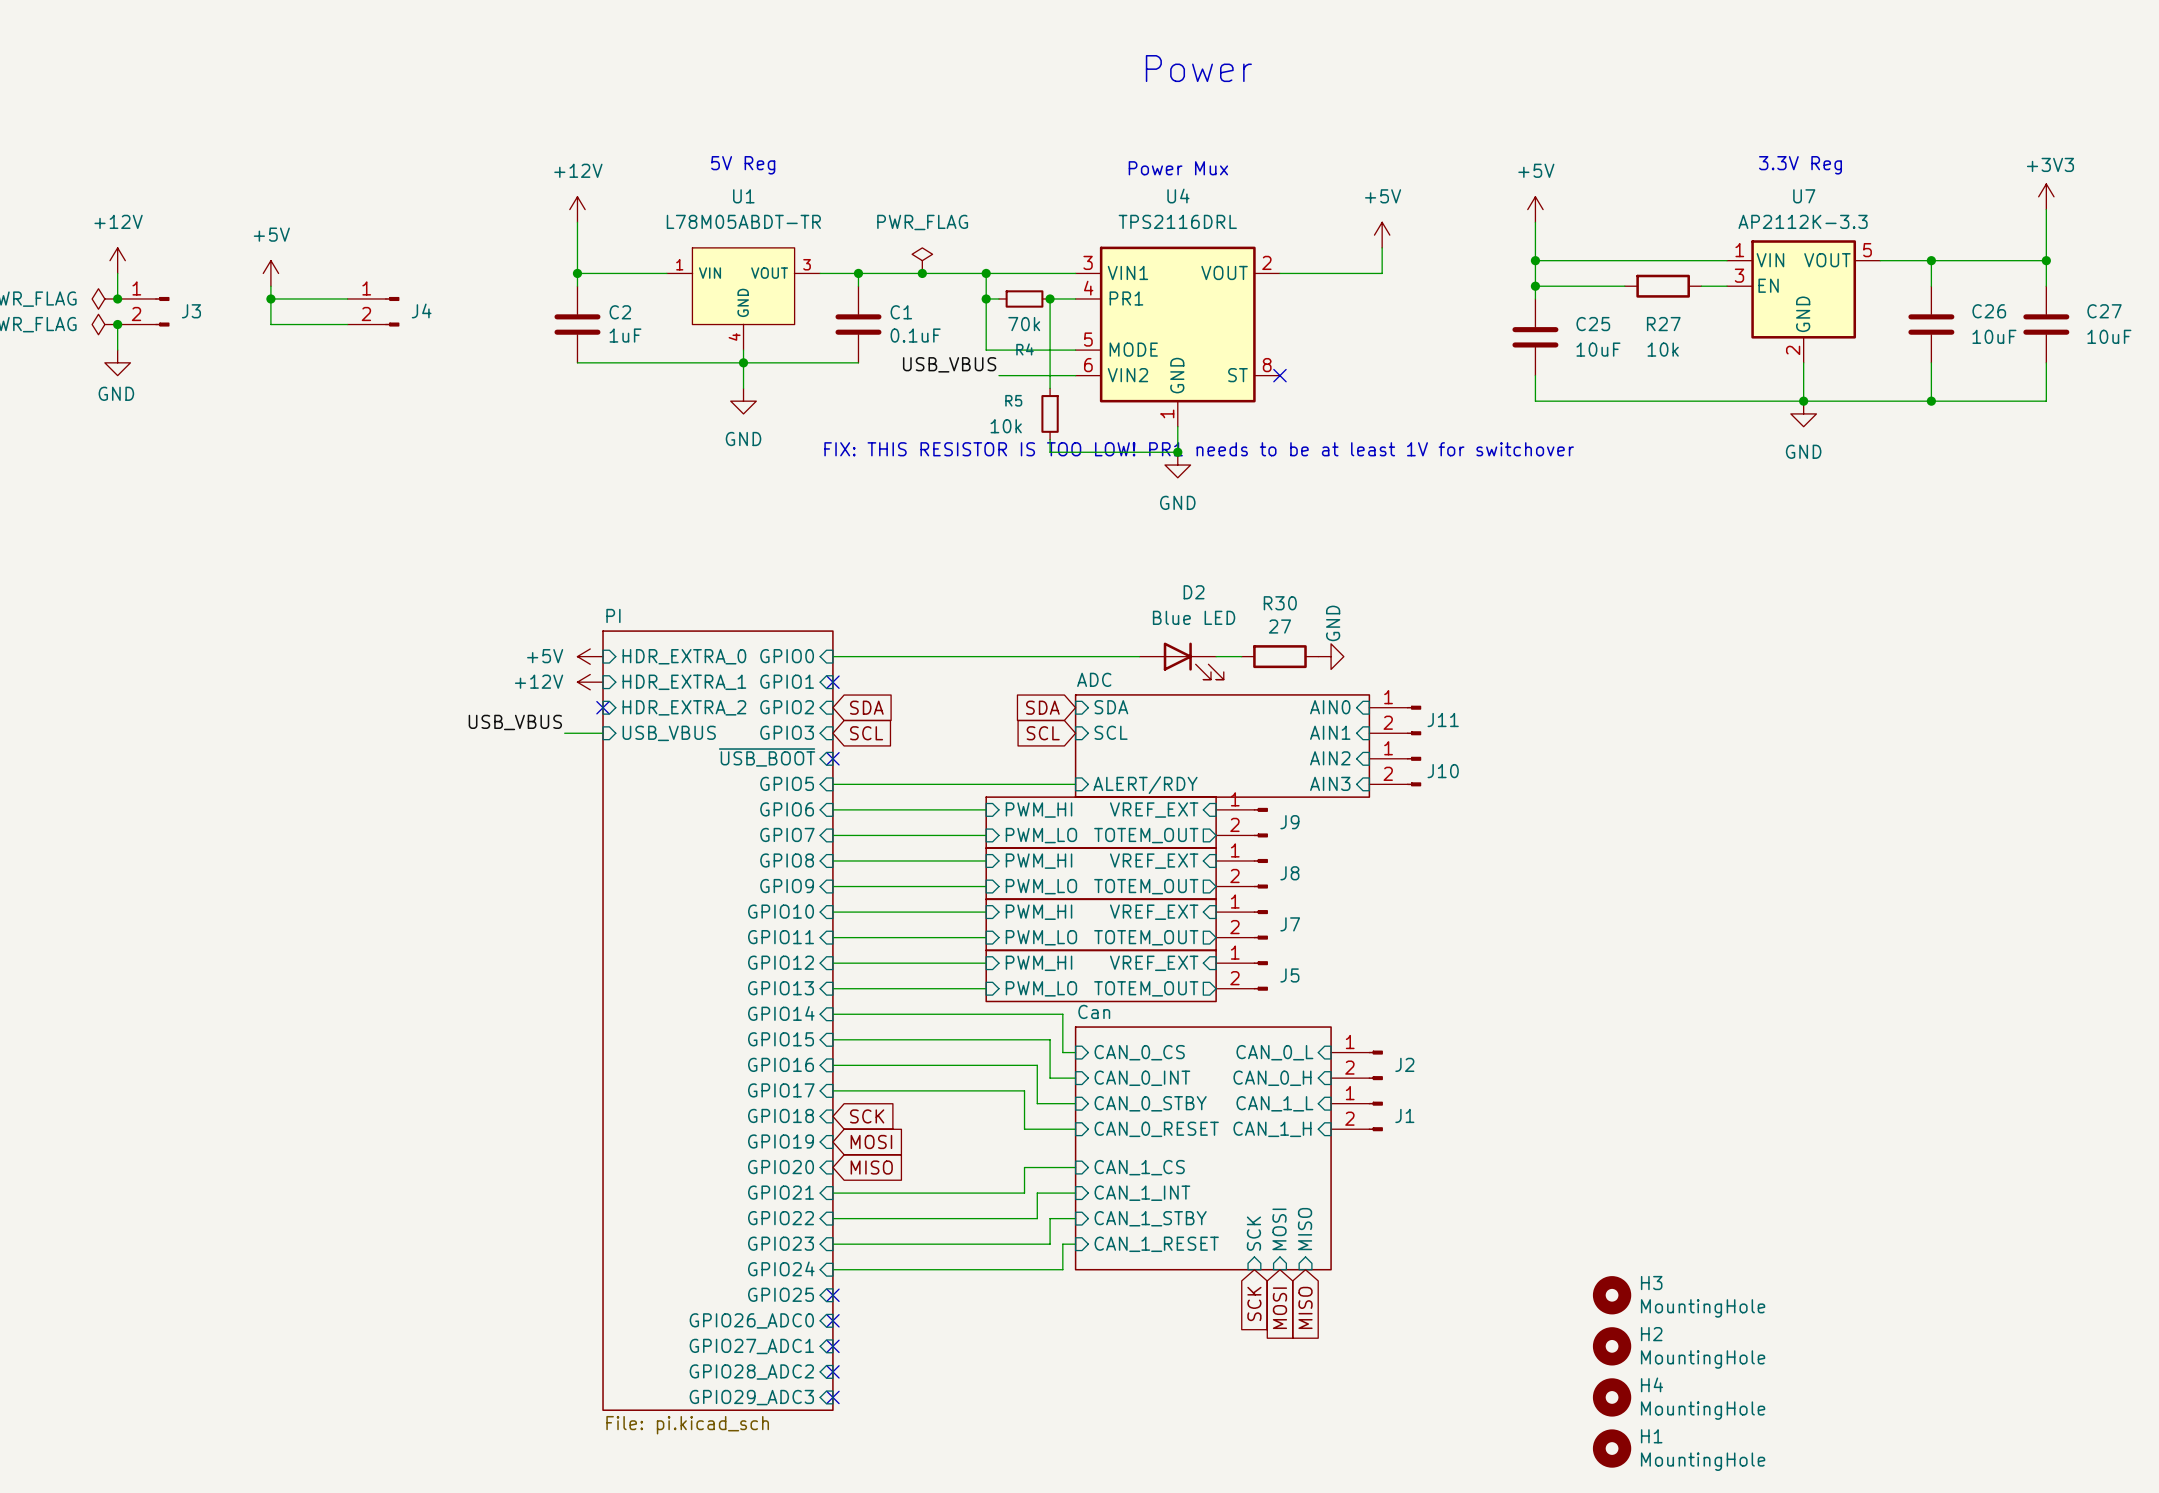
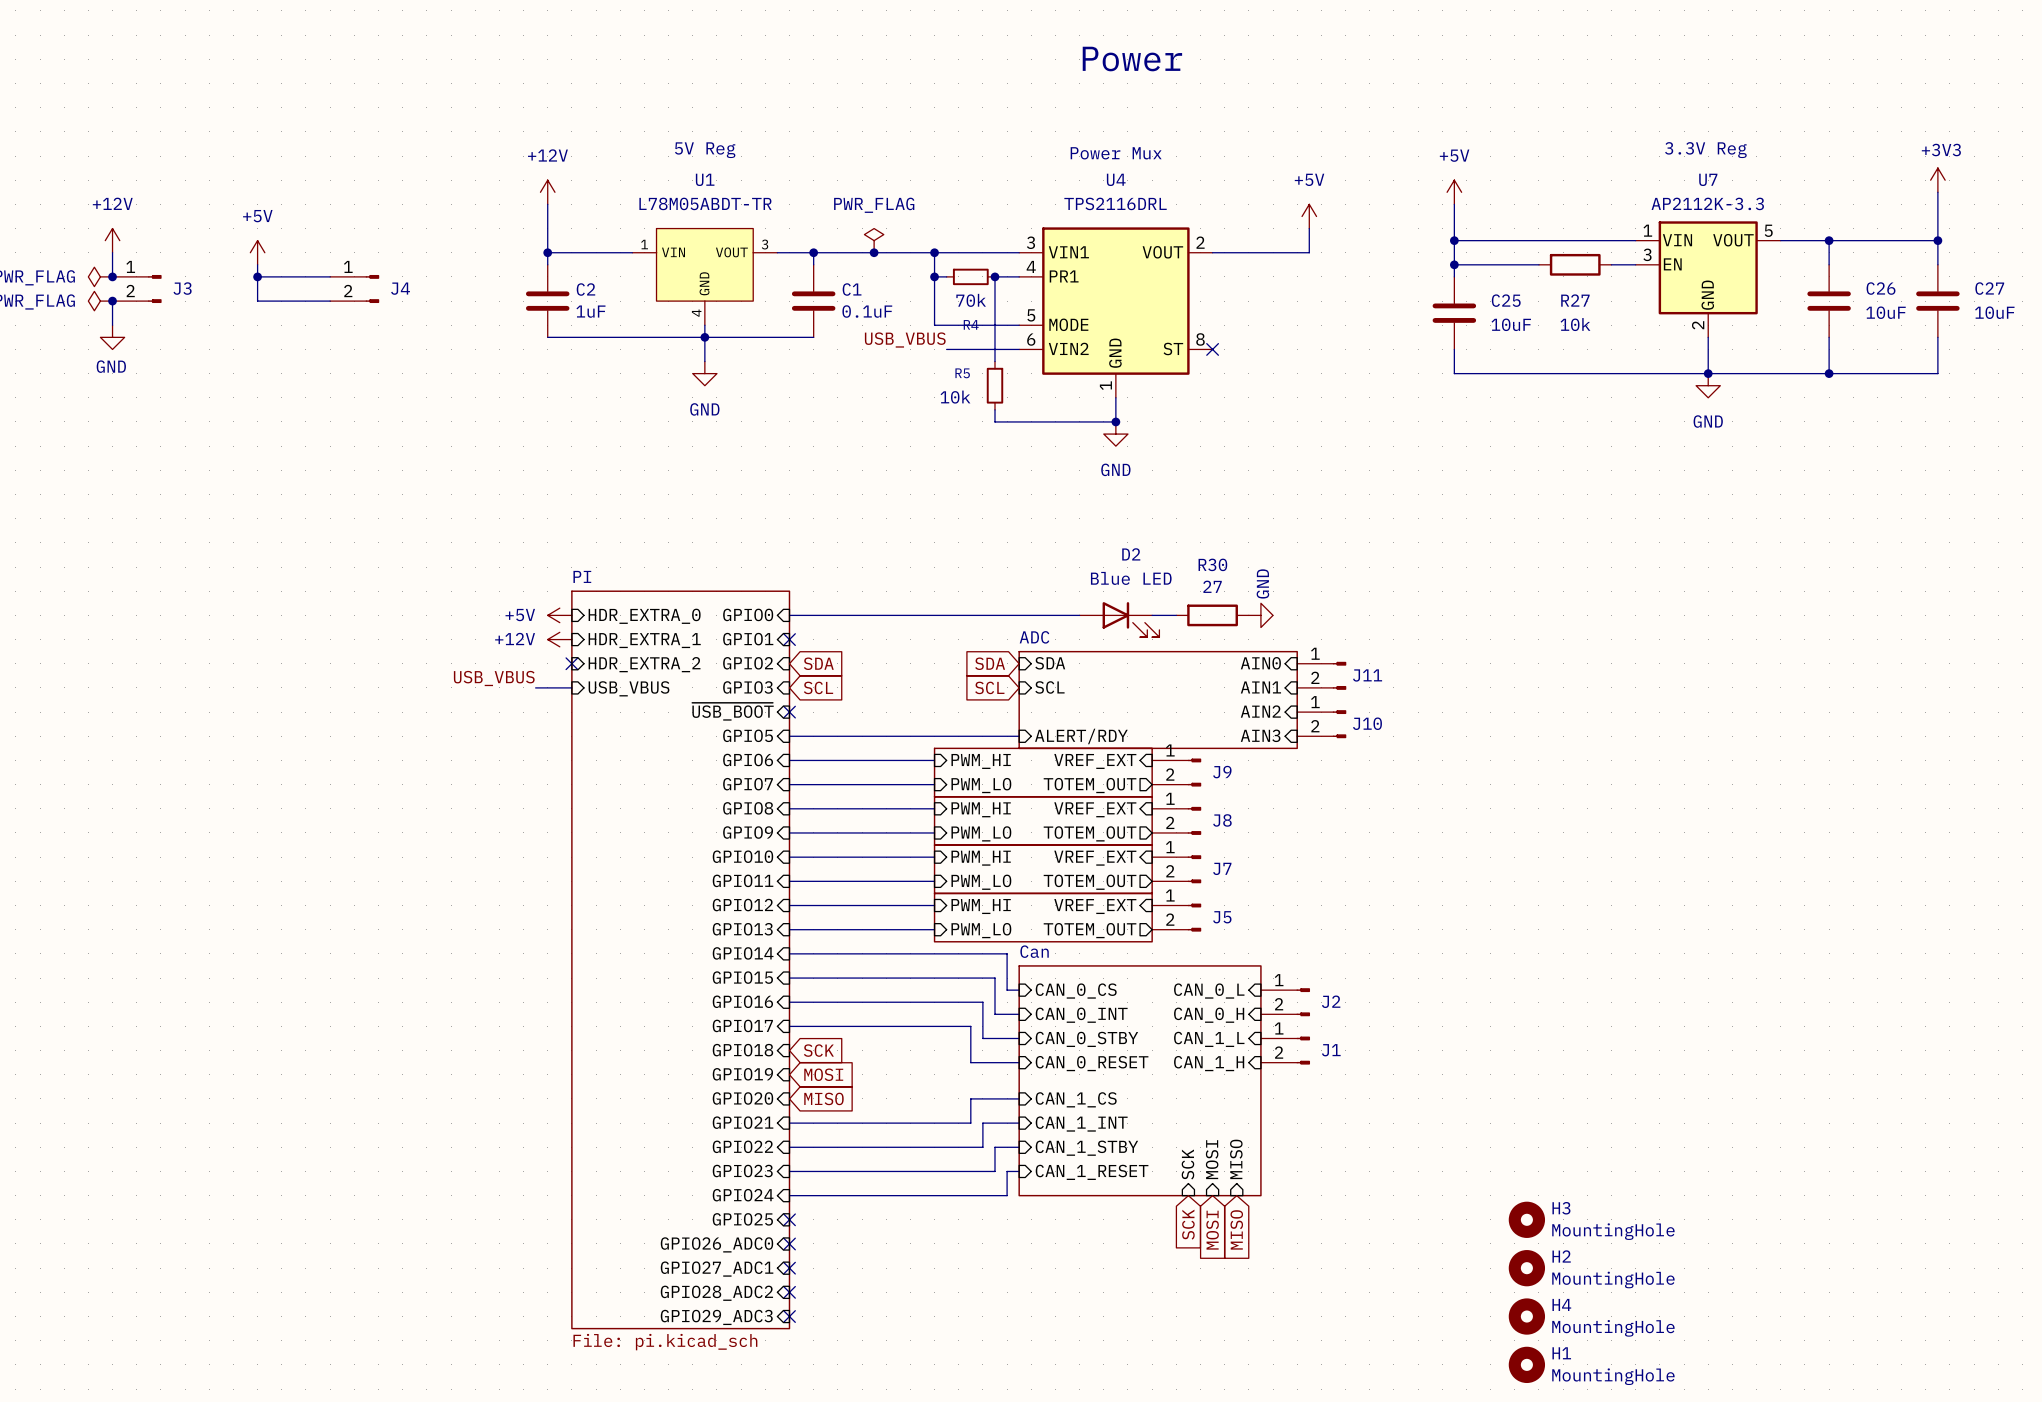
text: FIX: THIS RESISTOR IS TOO LOW! PR1 needs to be at least 1V for switchover (1199, 449) -> none

